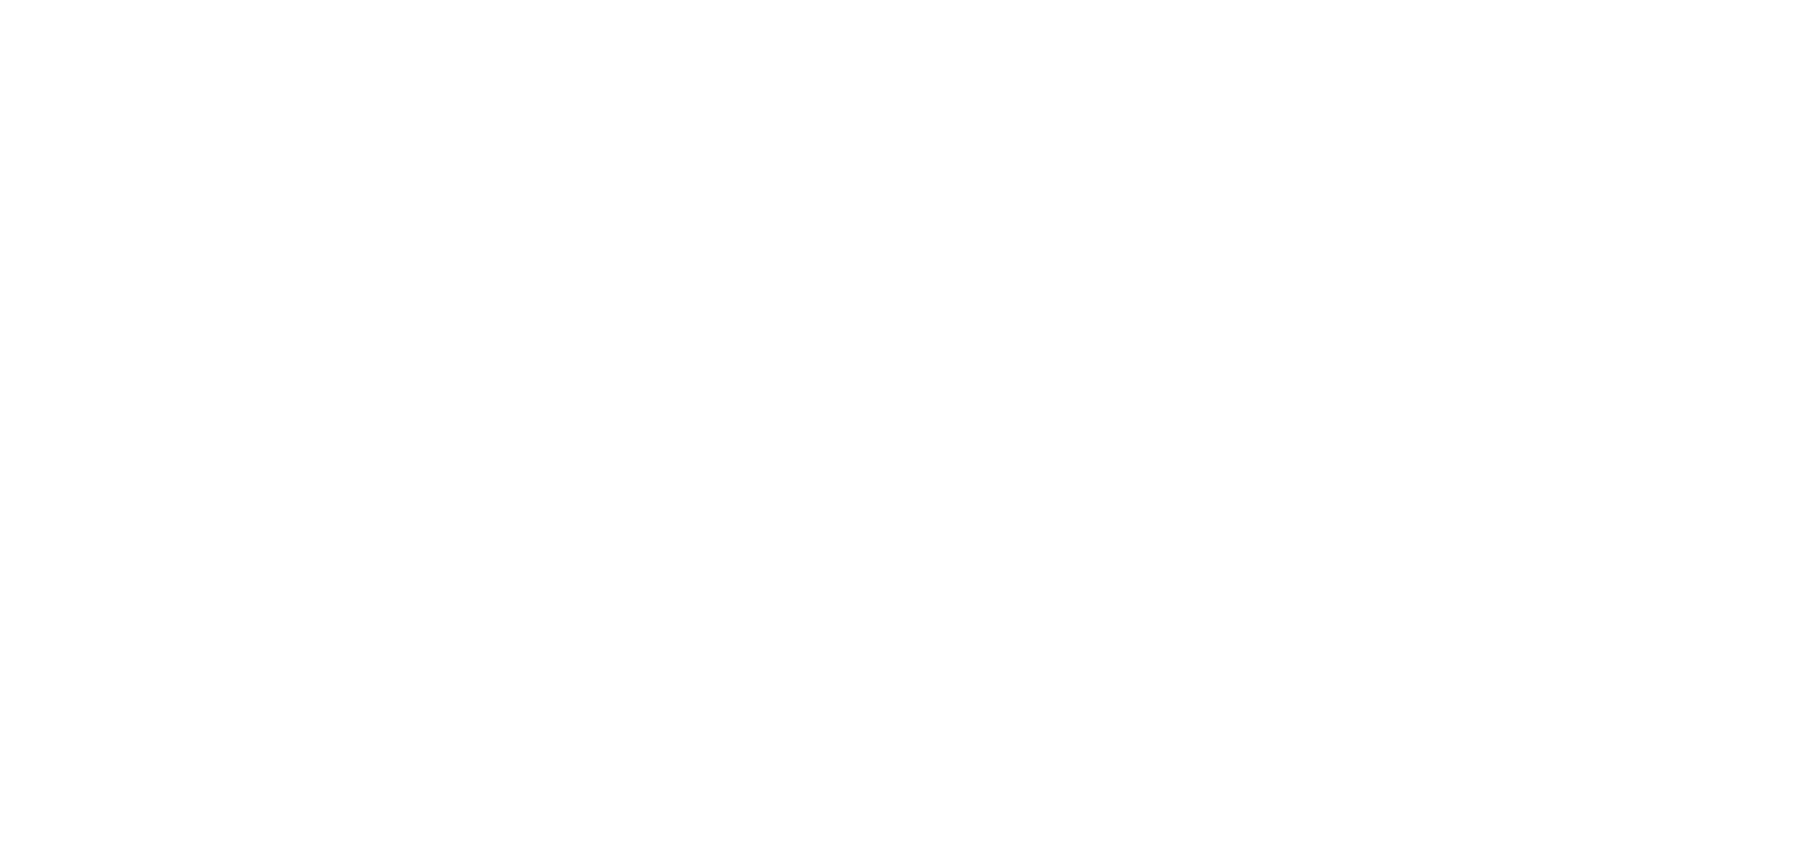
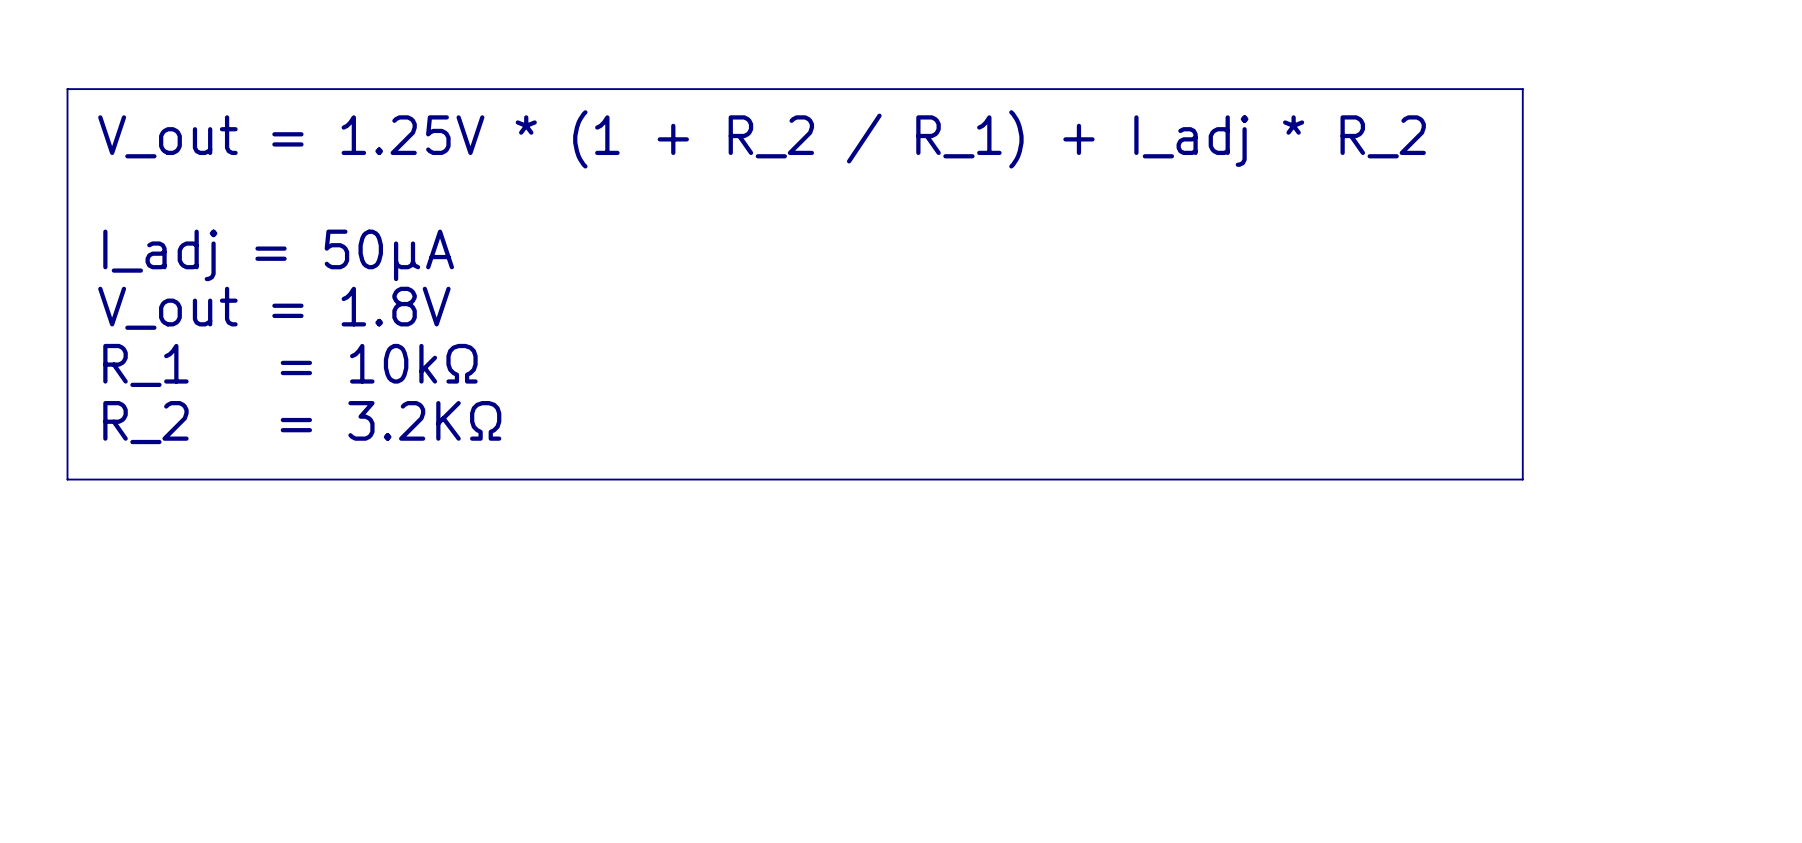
line: none -> (67, 89) (1522, 89) (1522, 479) (67, 479) (67, 89)
text: none -> V_out = 1.25V * (1 + R_2 / R_1) + I_adj * R_2 (762, 139)
text: none -> I_adj = 50µA (278, 255)
text: none -> V_out = 1.8V (274, 308)
text: none -> R_1 = 10kΩ (290, 365)
text: none -> R_2 = 3.2KΩ (302, 422)

